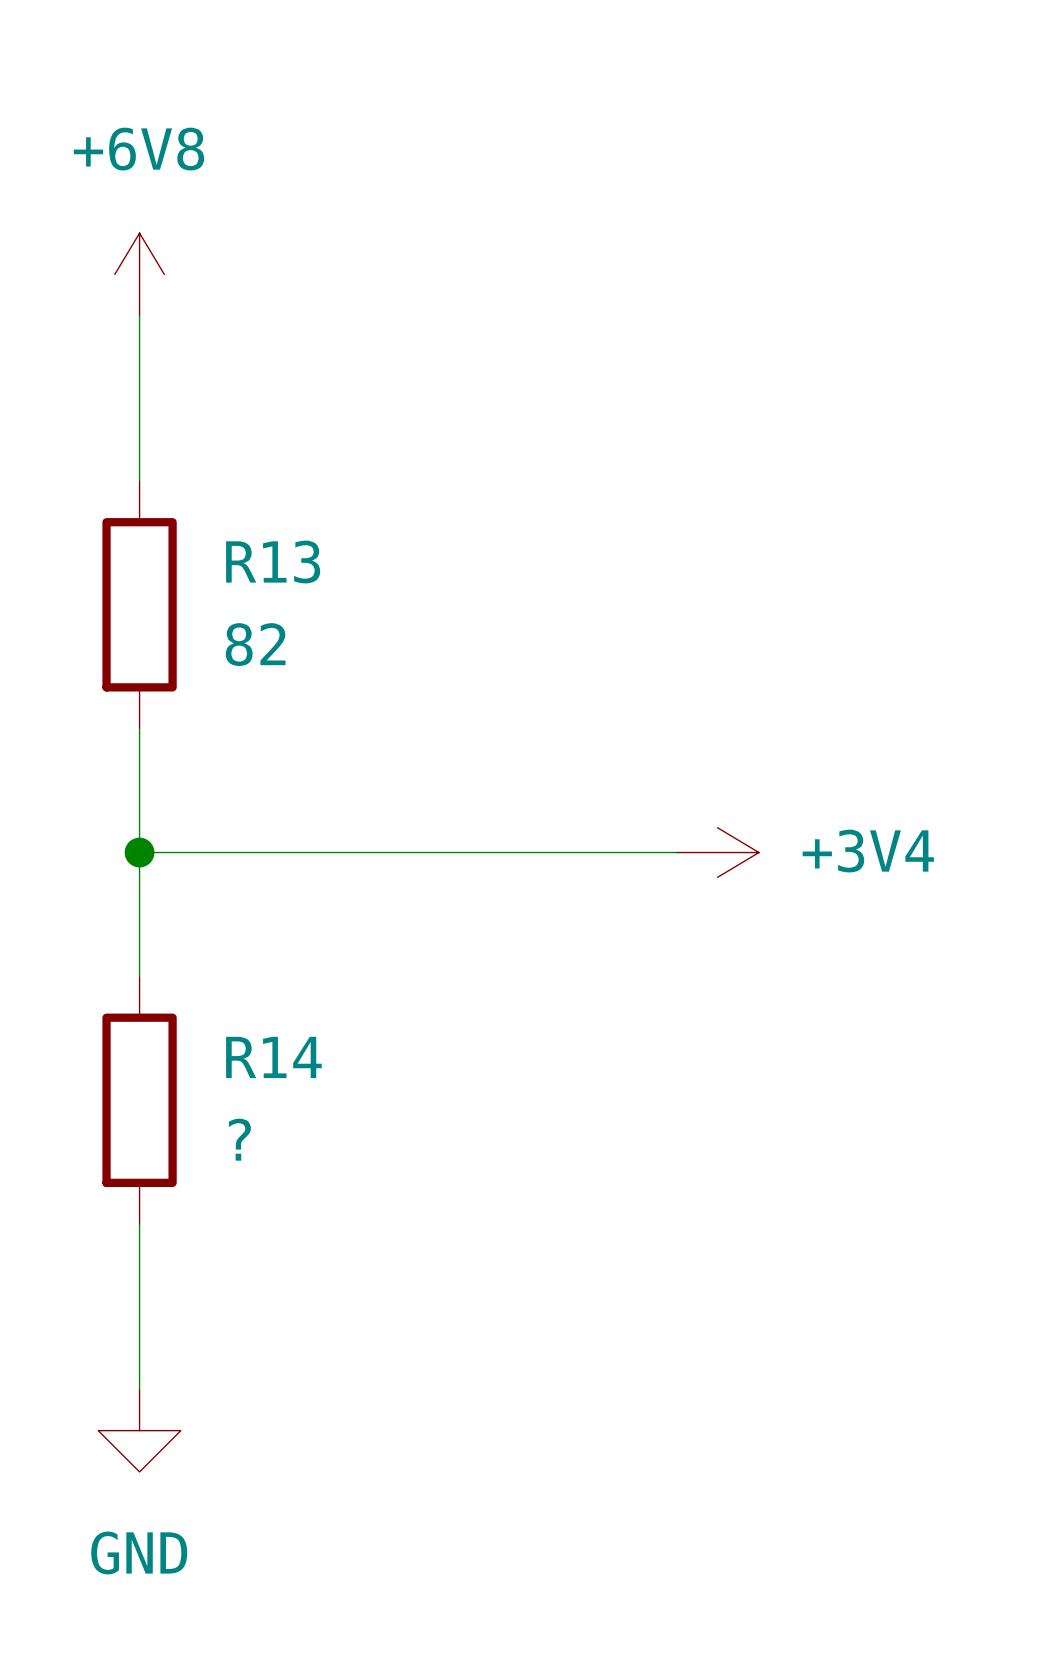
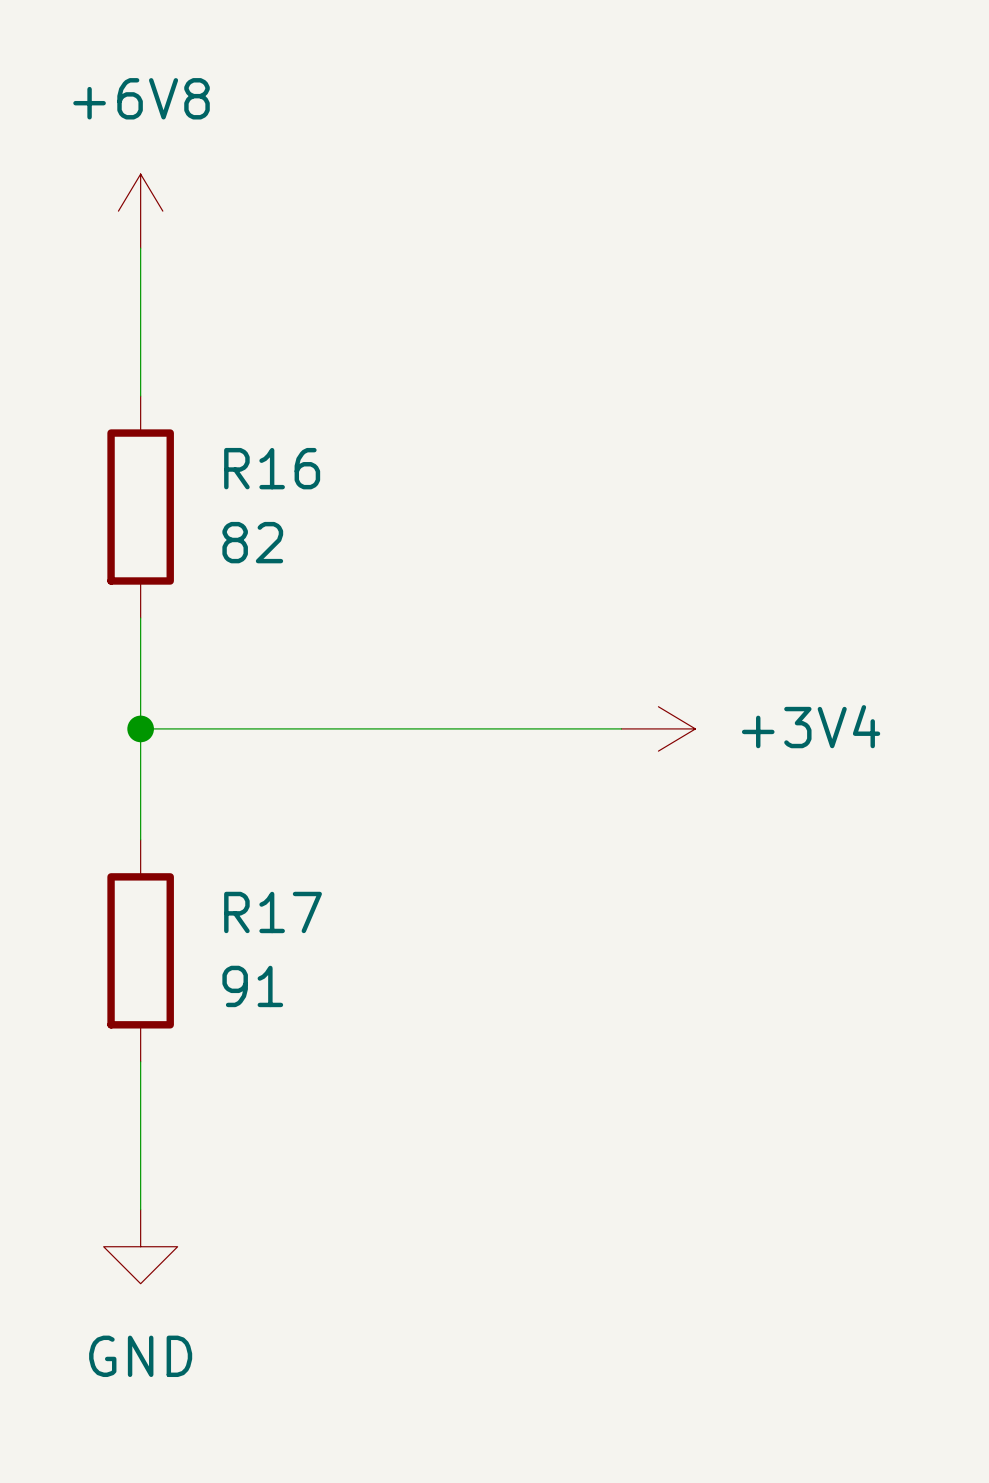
R13 name: R13 (273, 561) -> R16 (272, 468)
R14 name: R14 (273, 1057) -> R17 (273, 912)
R14 value: ? (239, 1139) -> 91 (252, 986)

